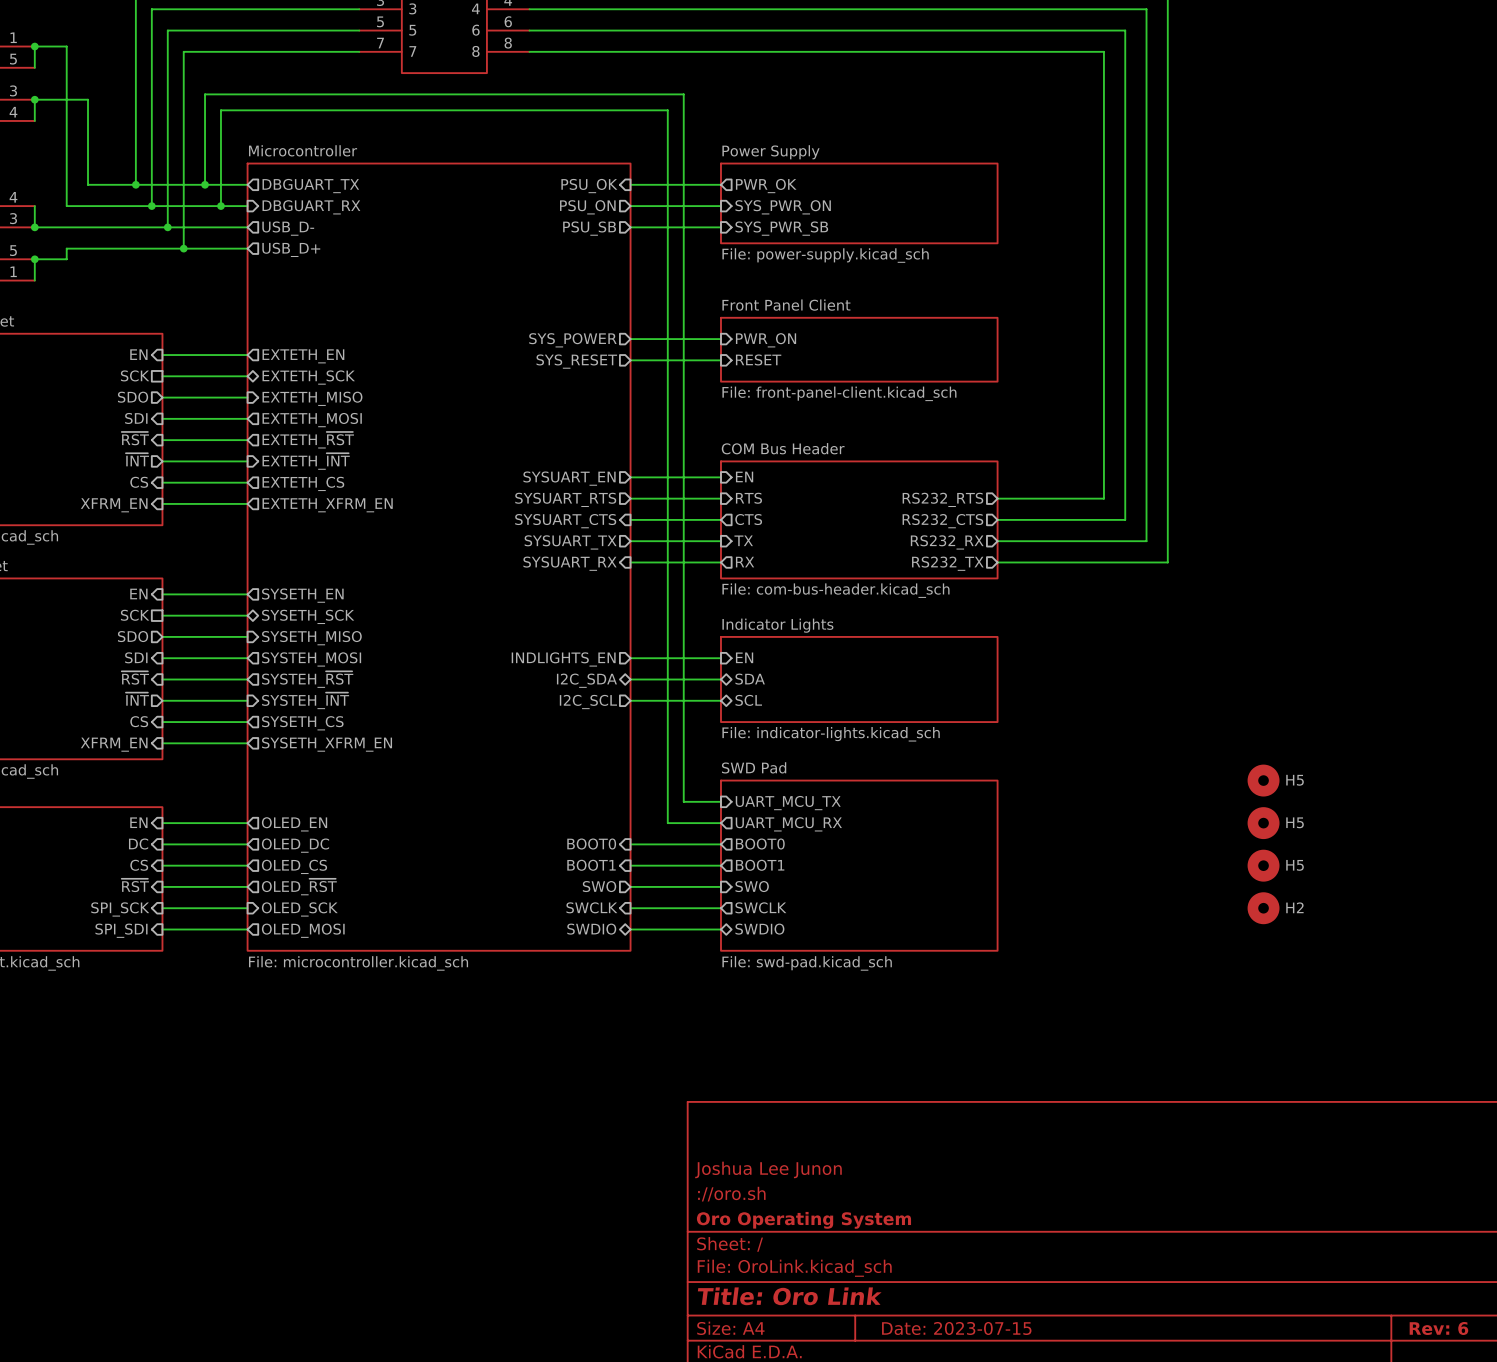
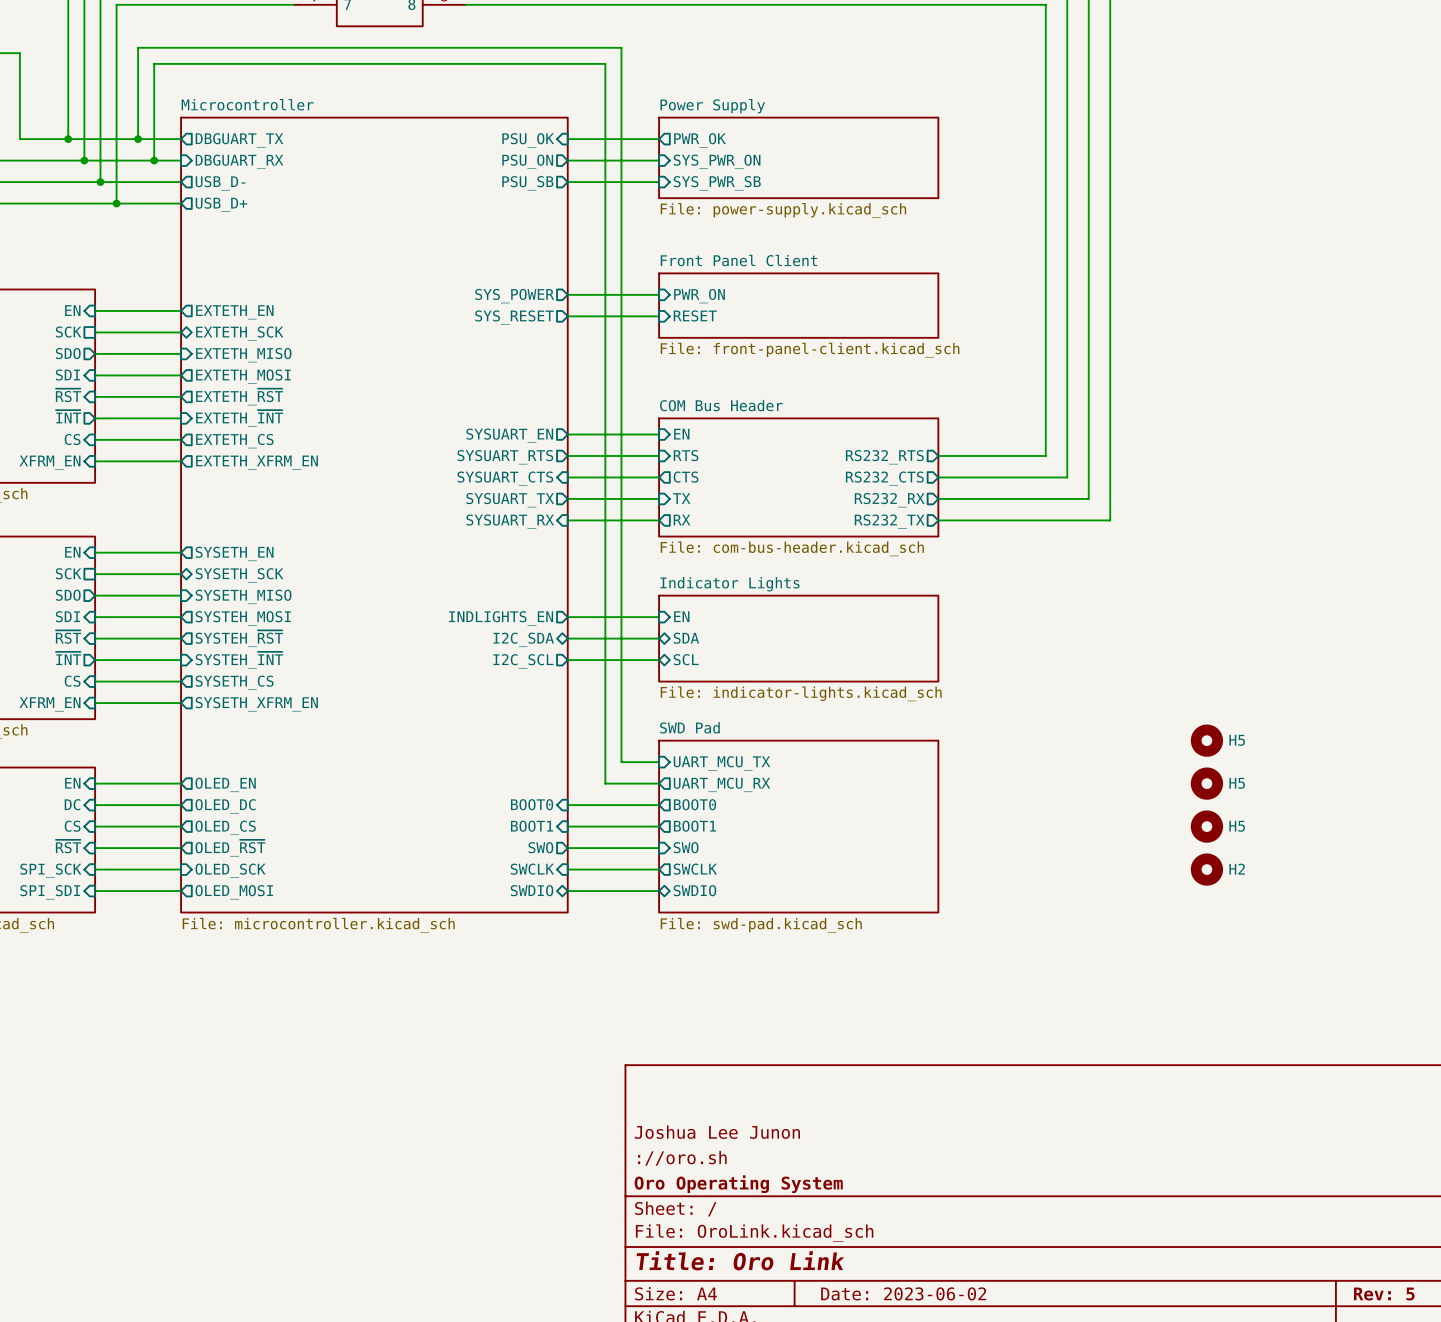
title block: Date: 2023-07-15 (956, 1328) -> Date: 2023-06-02 (903, 1293)
title block: Rev: 6 (1438, 1328) -> Rev: 5 (1384, 1294)

